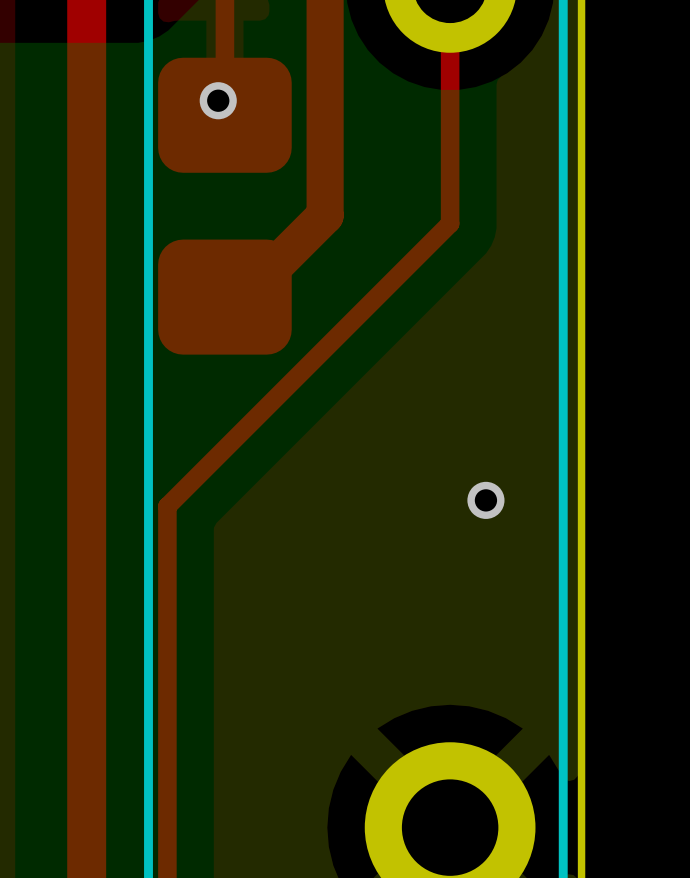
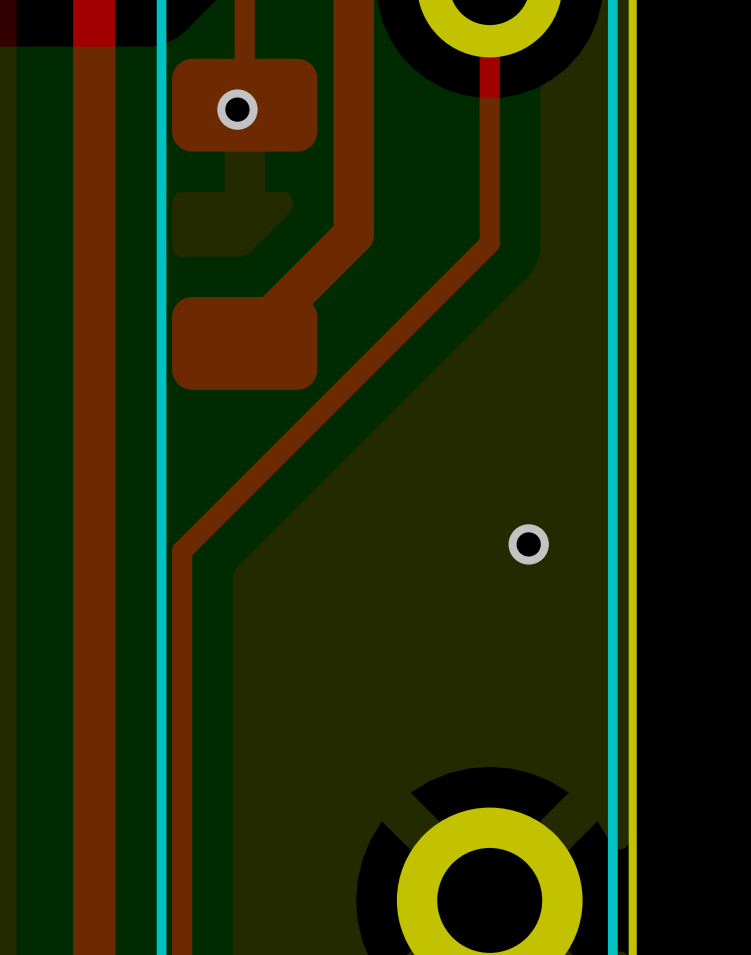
part footprint: [158, 57, 292, 355] -> [172, 58, 318, 390]

